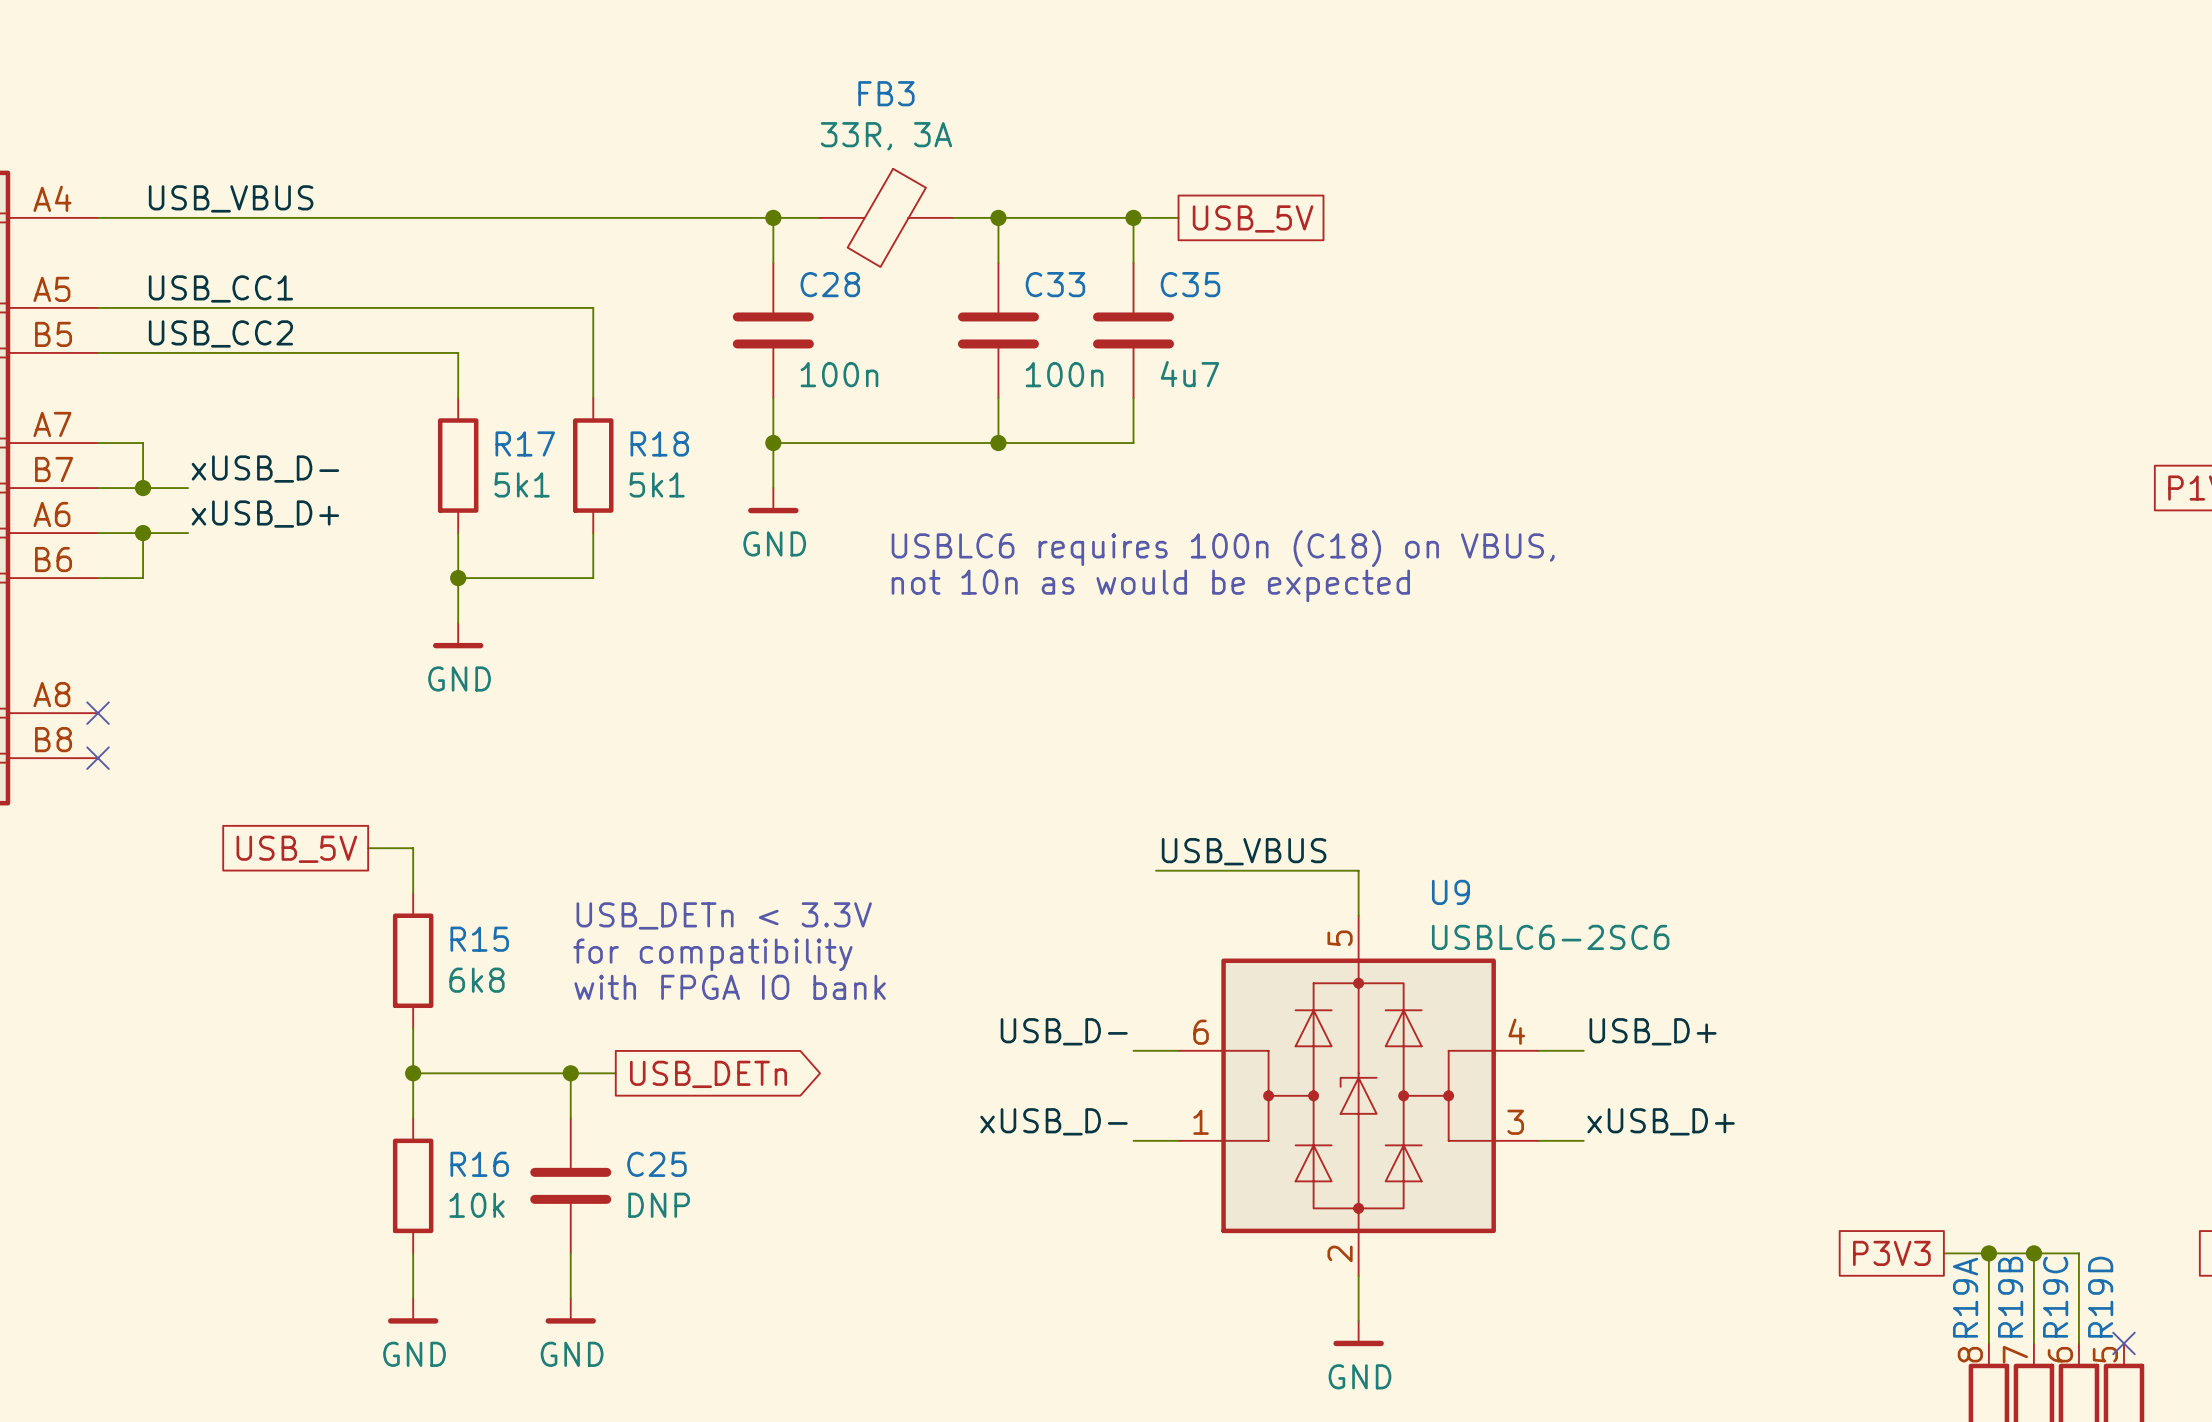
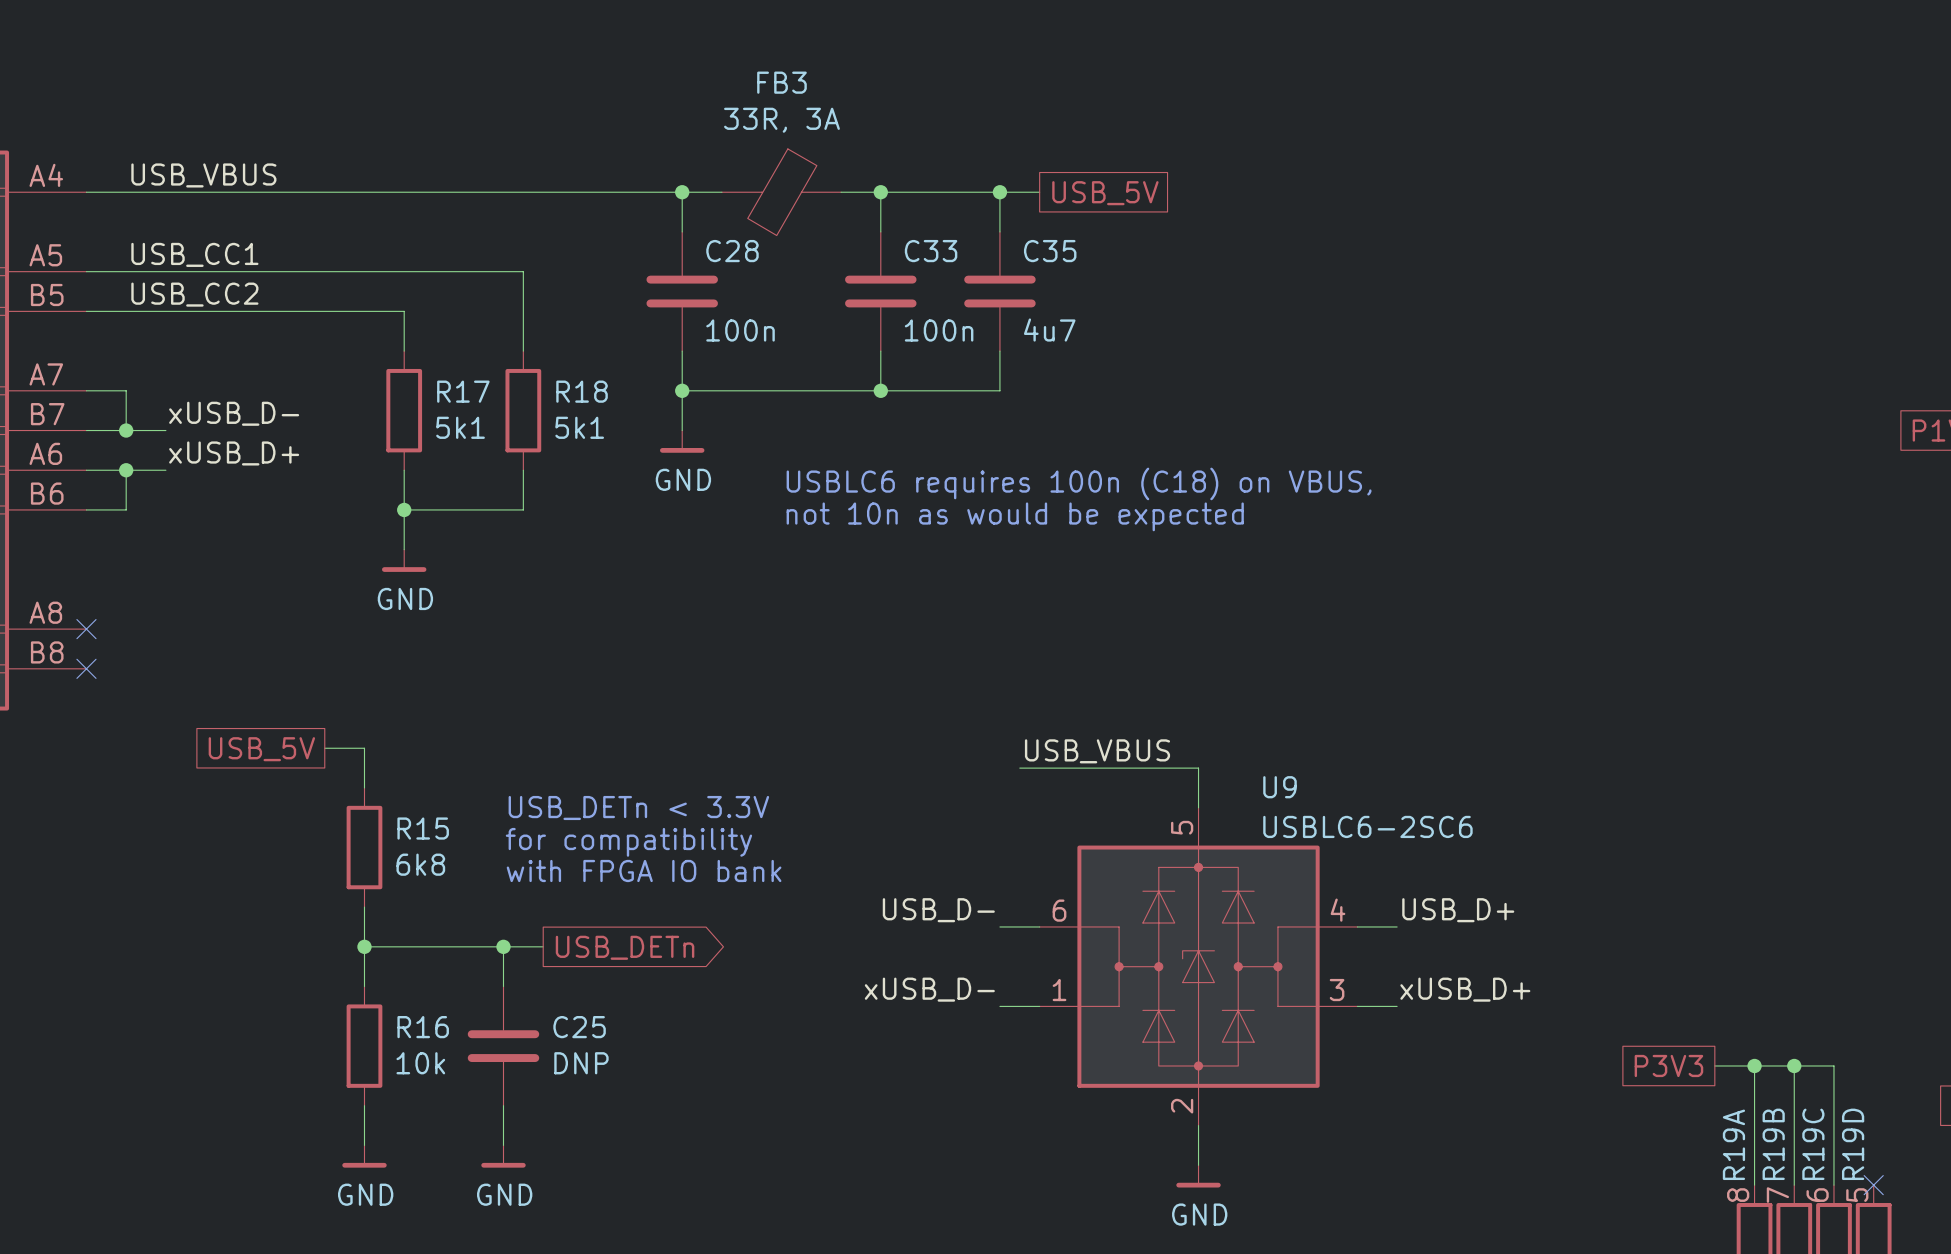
wire: none -> (1754, 1065) (1754, 1105)
junction: none -> (1754, 1065)
wire: none -> (1794, 1065) (1794, 1105)
junction: none -> (1794, 1065)
global label position: P3V3 (1891, 1253) -> P3V3 (1668, 1065)
wire: (1943, 1253) (2078, 1253) -> (1714, 1065) (1833, 1065) (1833, 1105)
junction: (1988, 1253) -> none
junction: (2033, 1253) -> none

